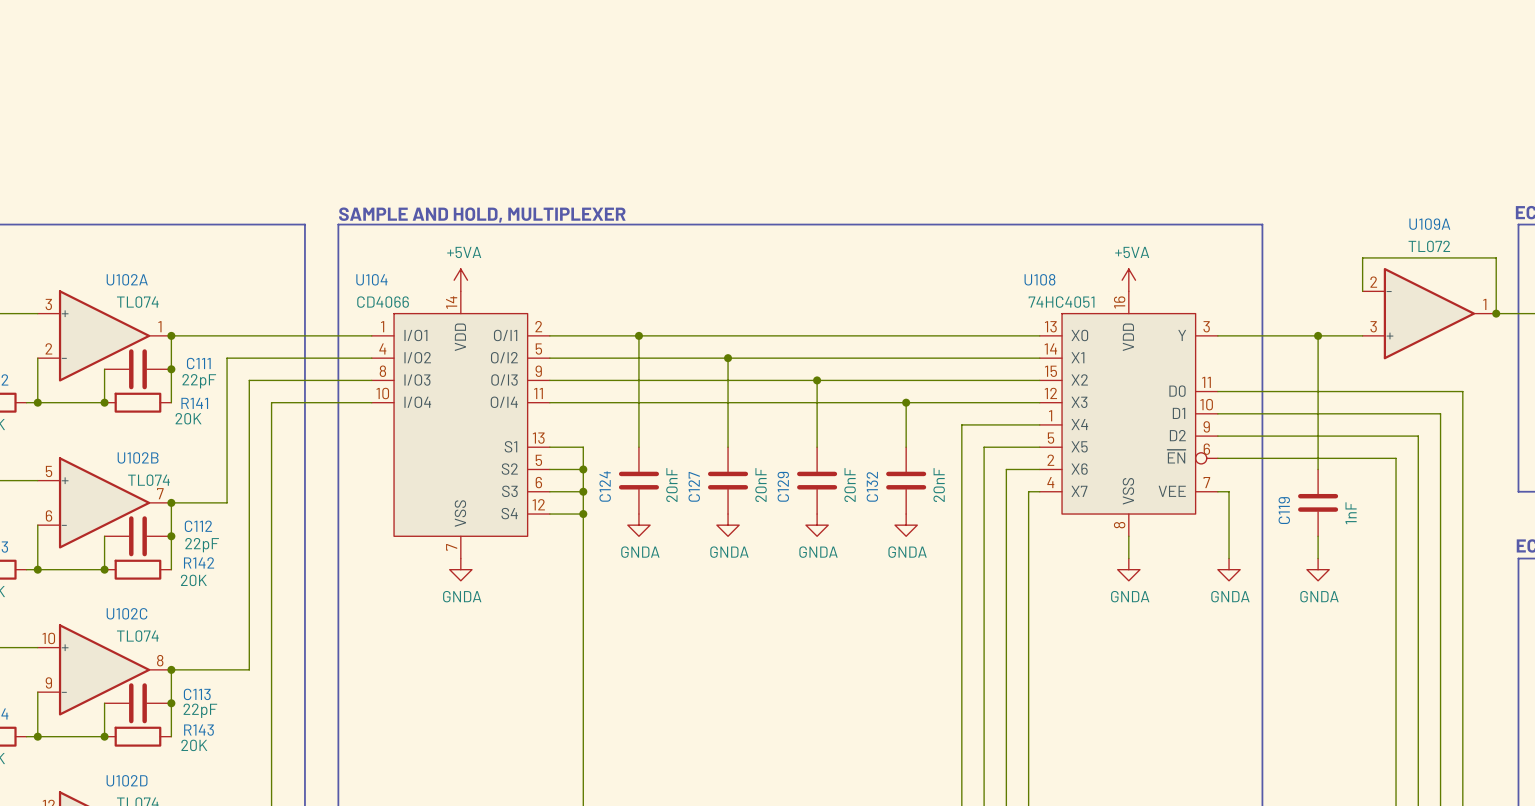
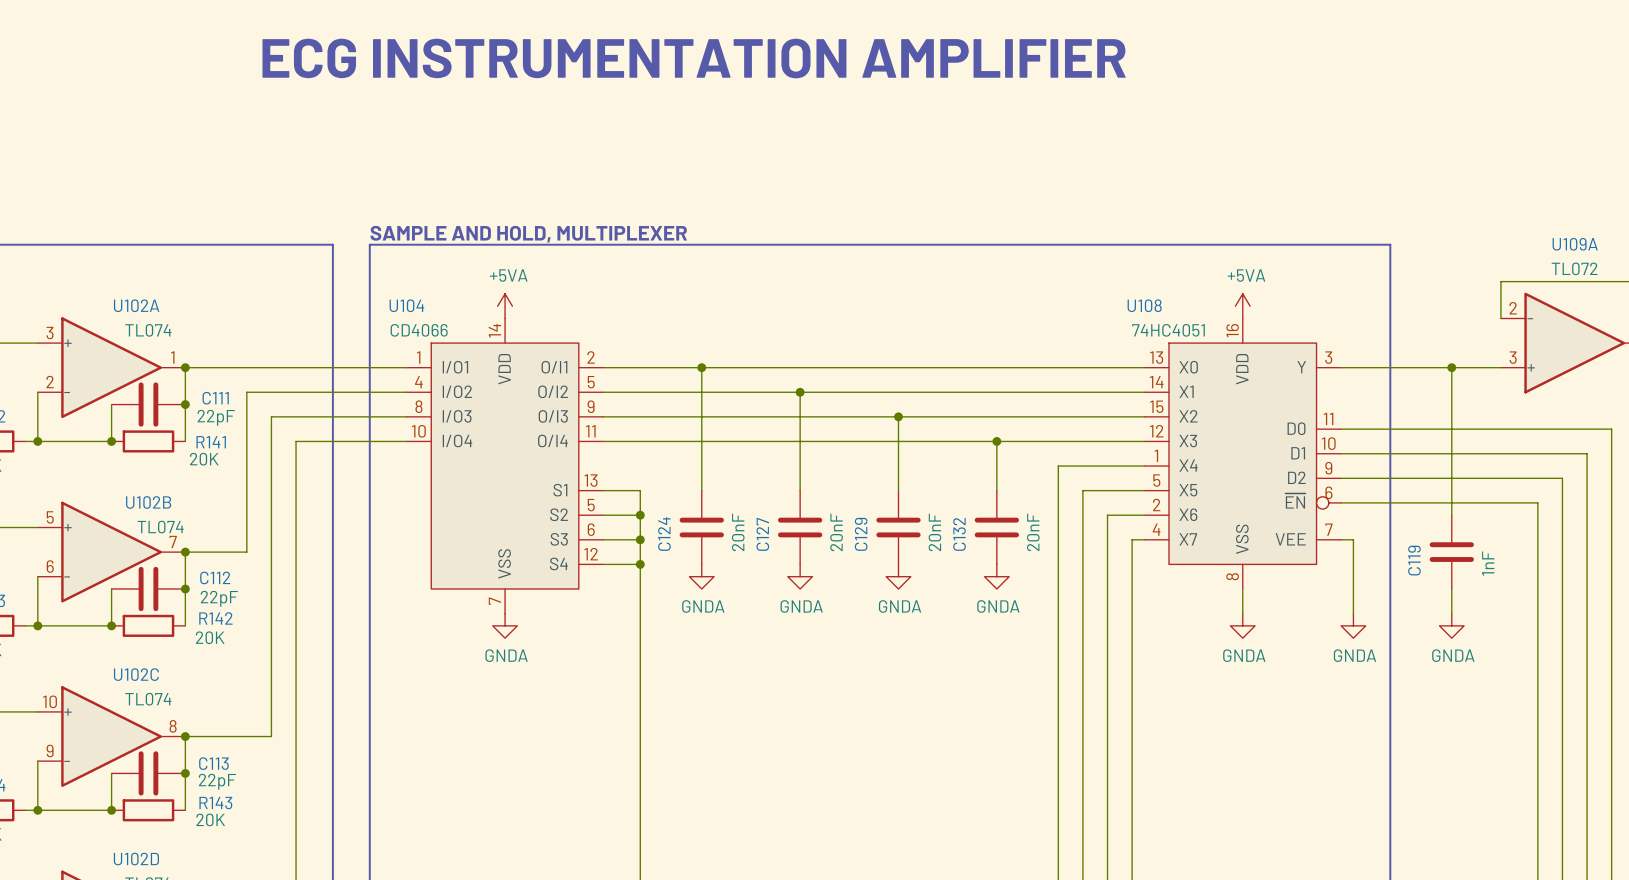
text: none -> ECG INSTRUMENTATION AMPLIFIER (694, 58)

